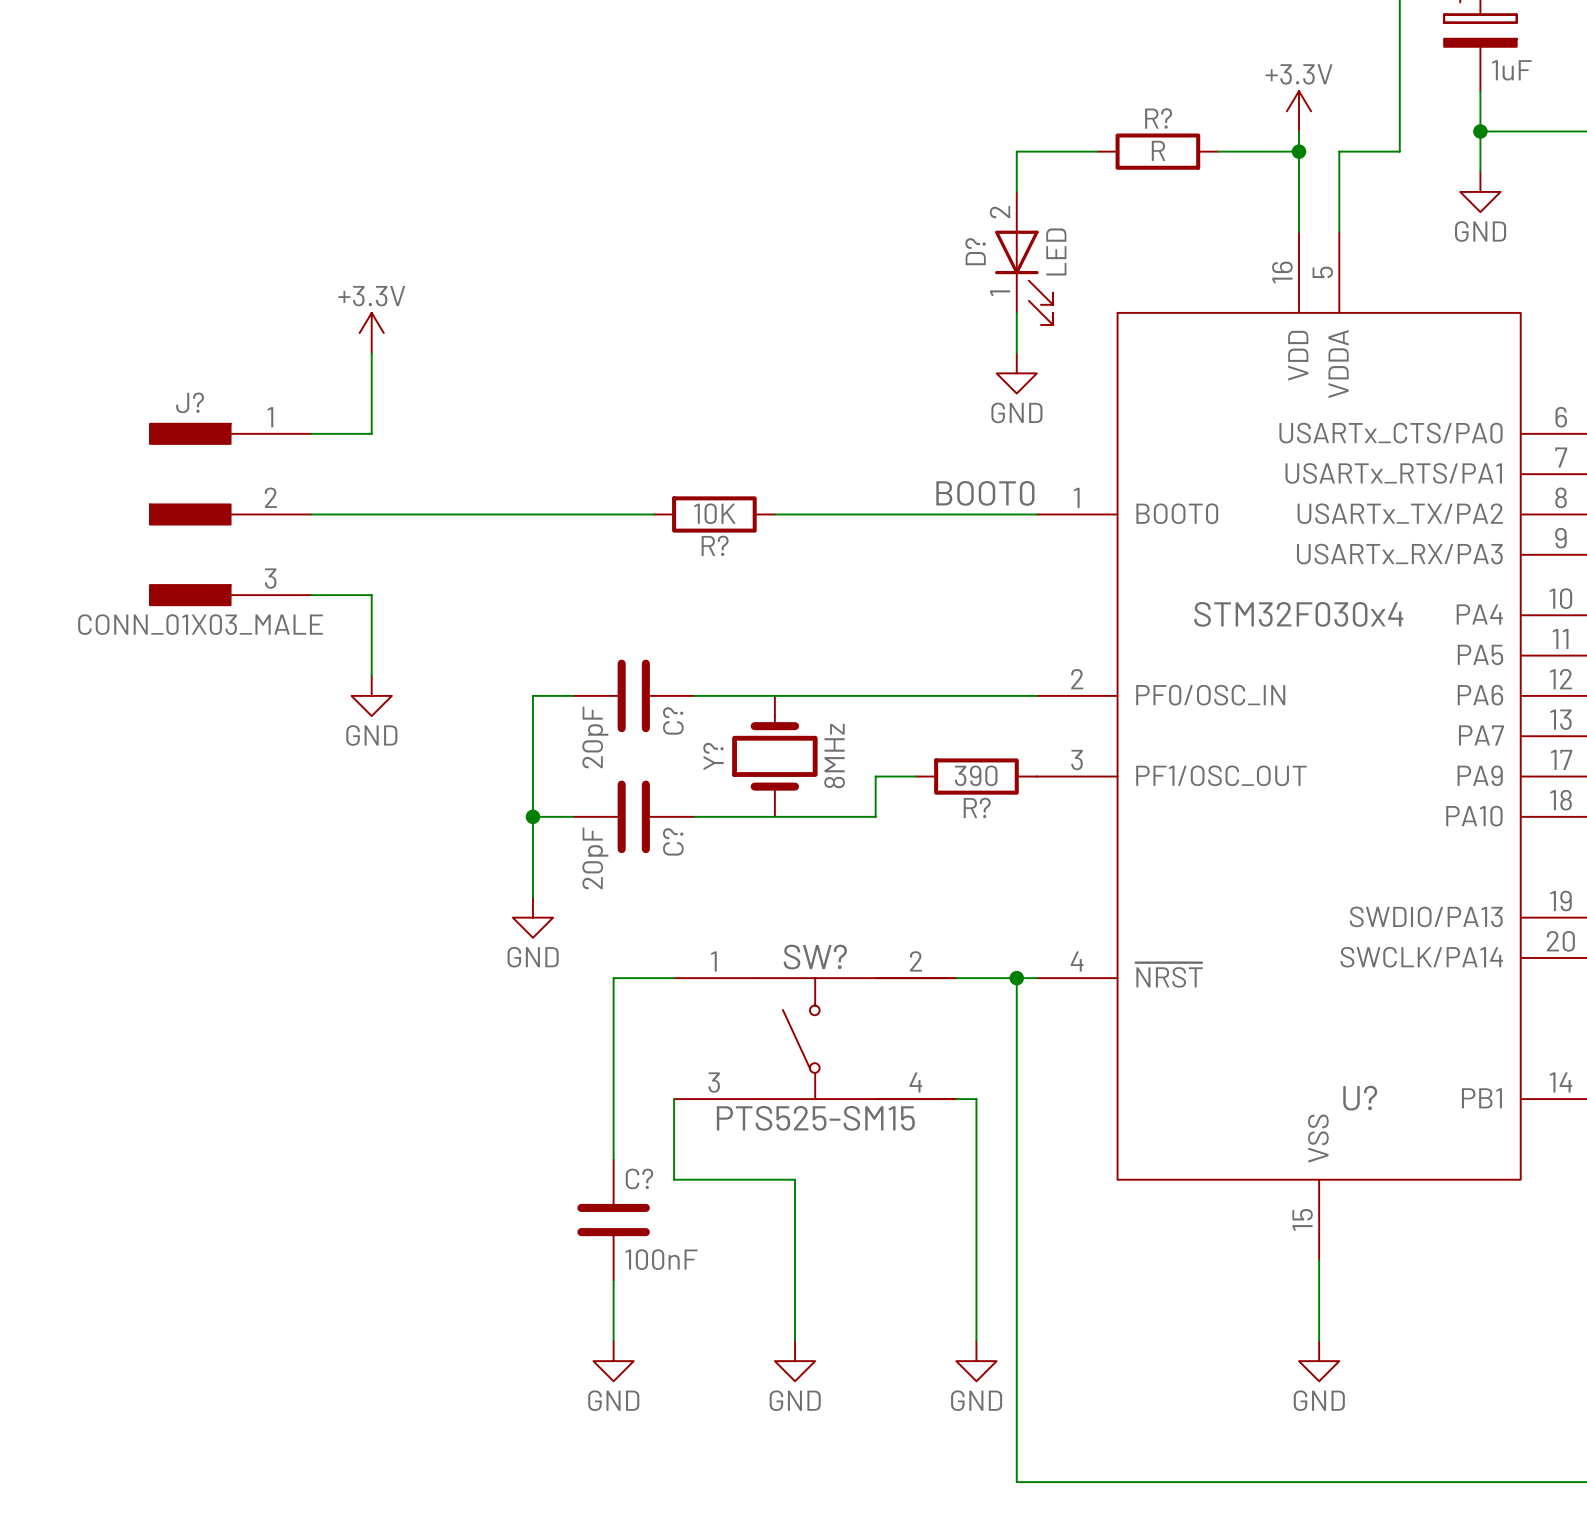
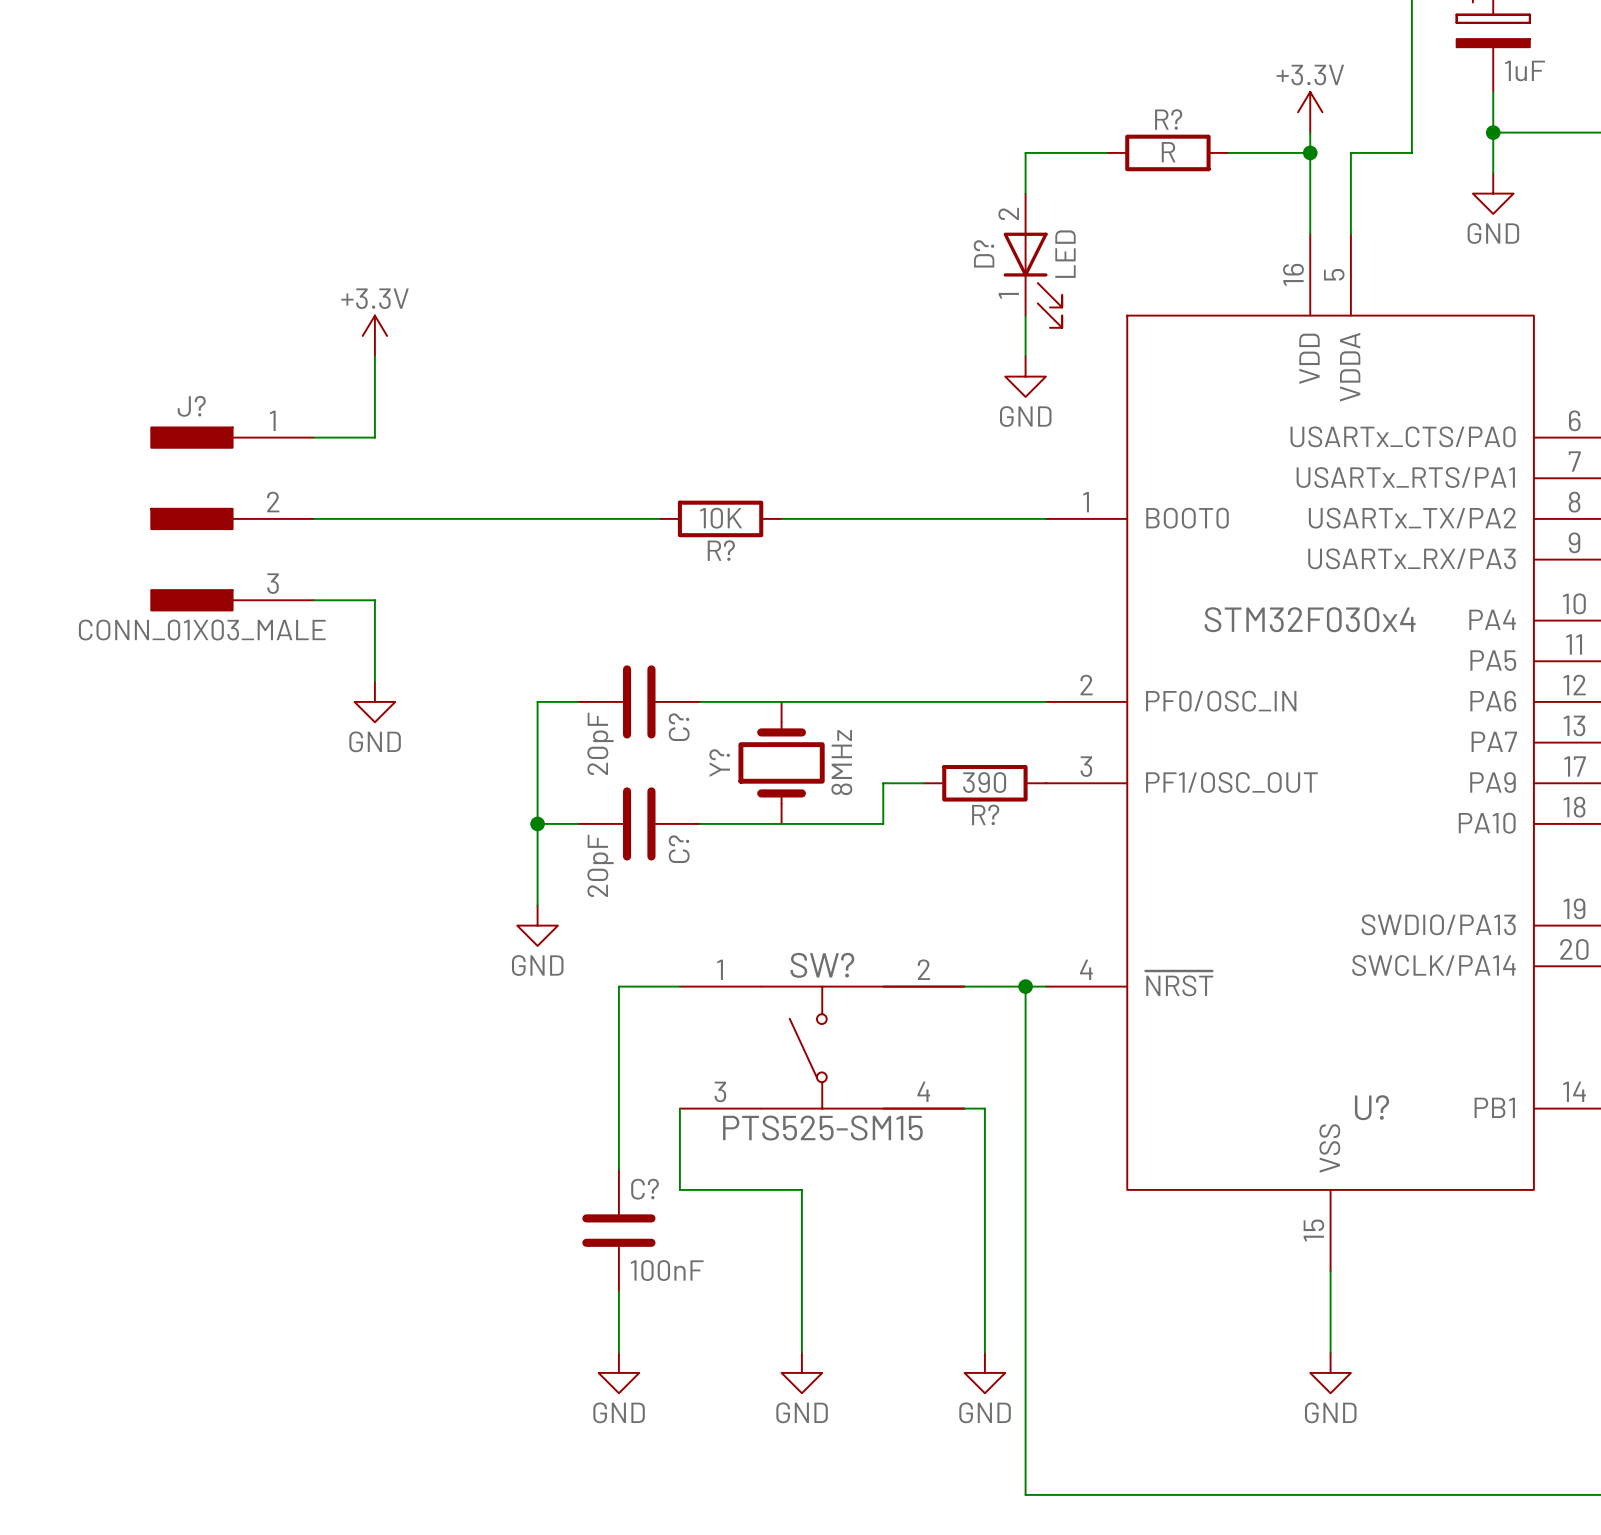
label: BOOT0 (985, 493) -> none

